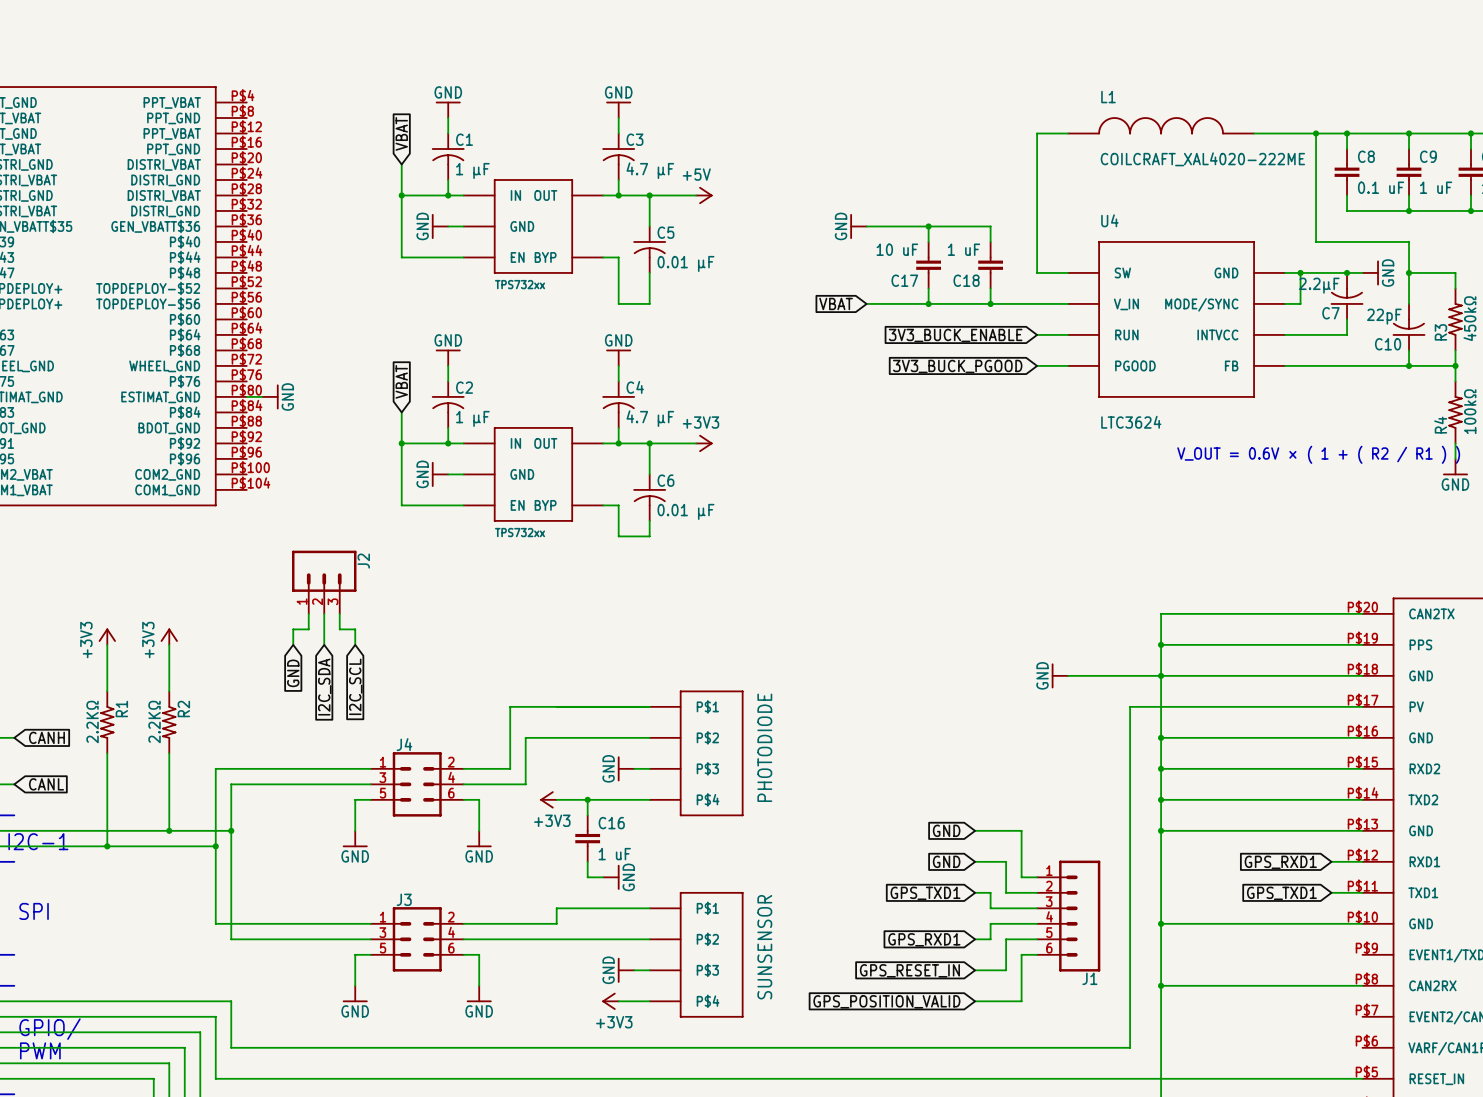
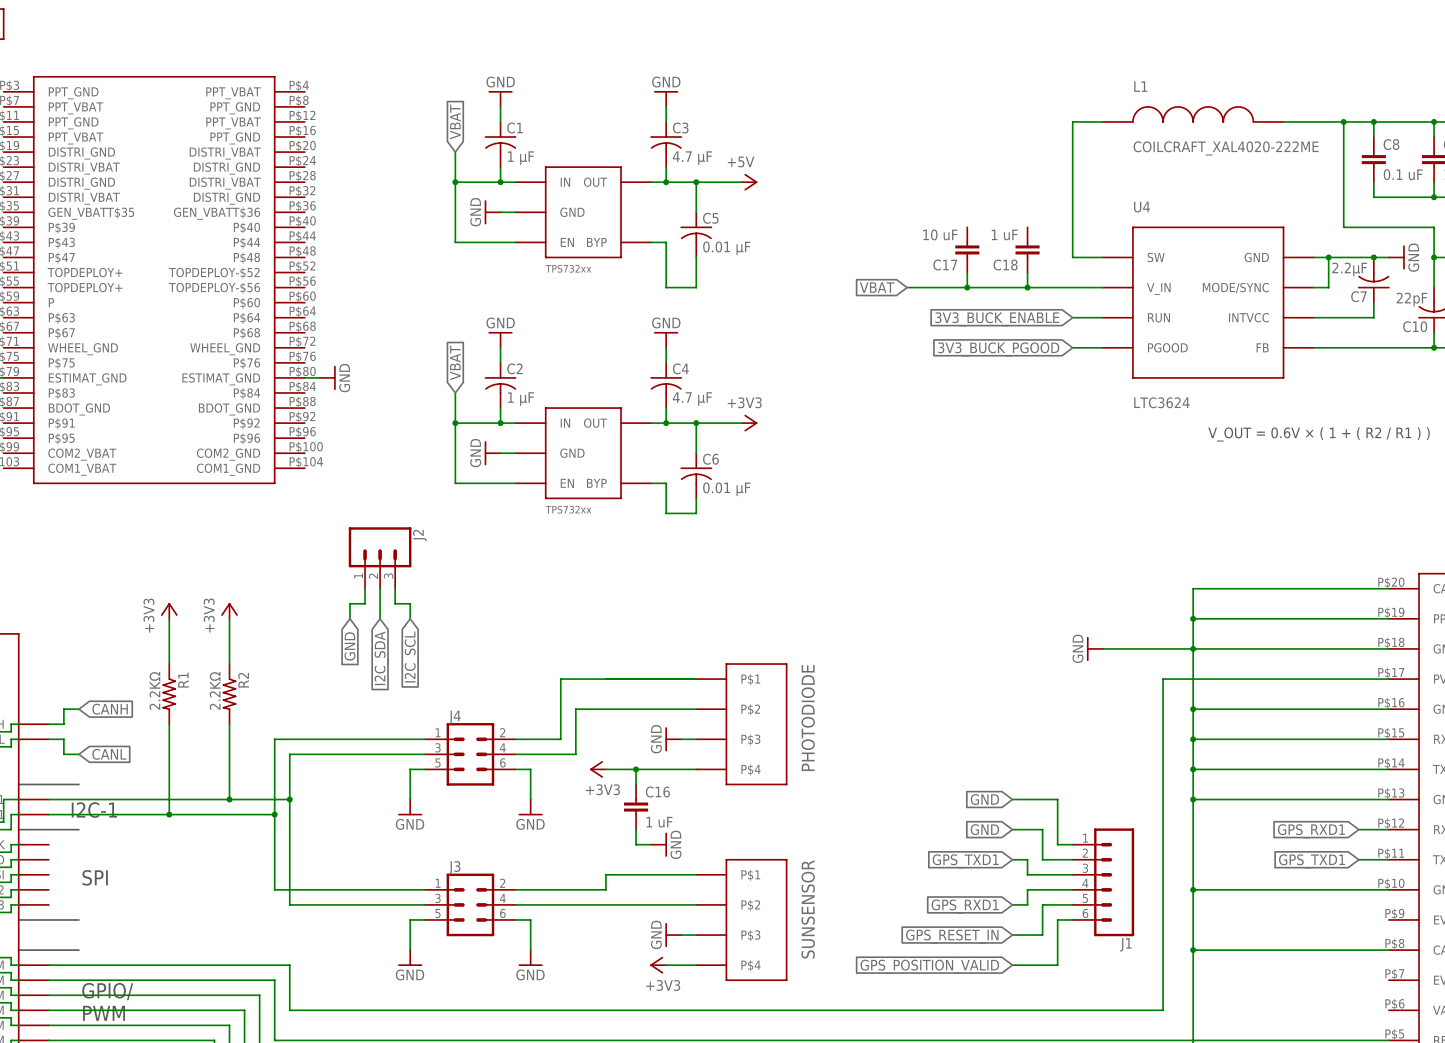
power symbol: GND (858, 226) -> none
wire: (866, 226) (990, 226) (990, 241) -> none
wire: (928, 226) (928, 241) -> none
junction: (928, 226) -> none

